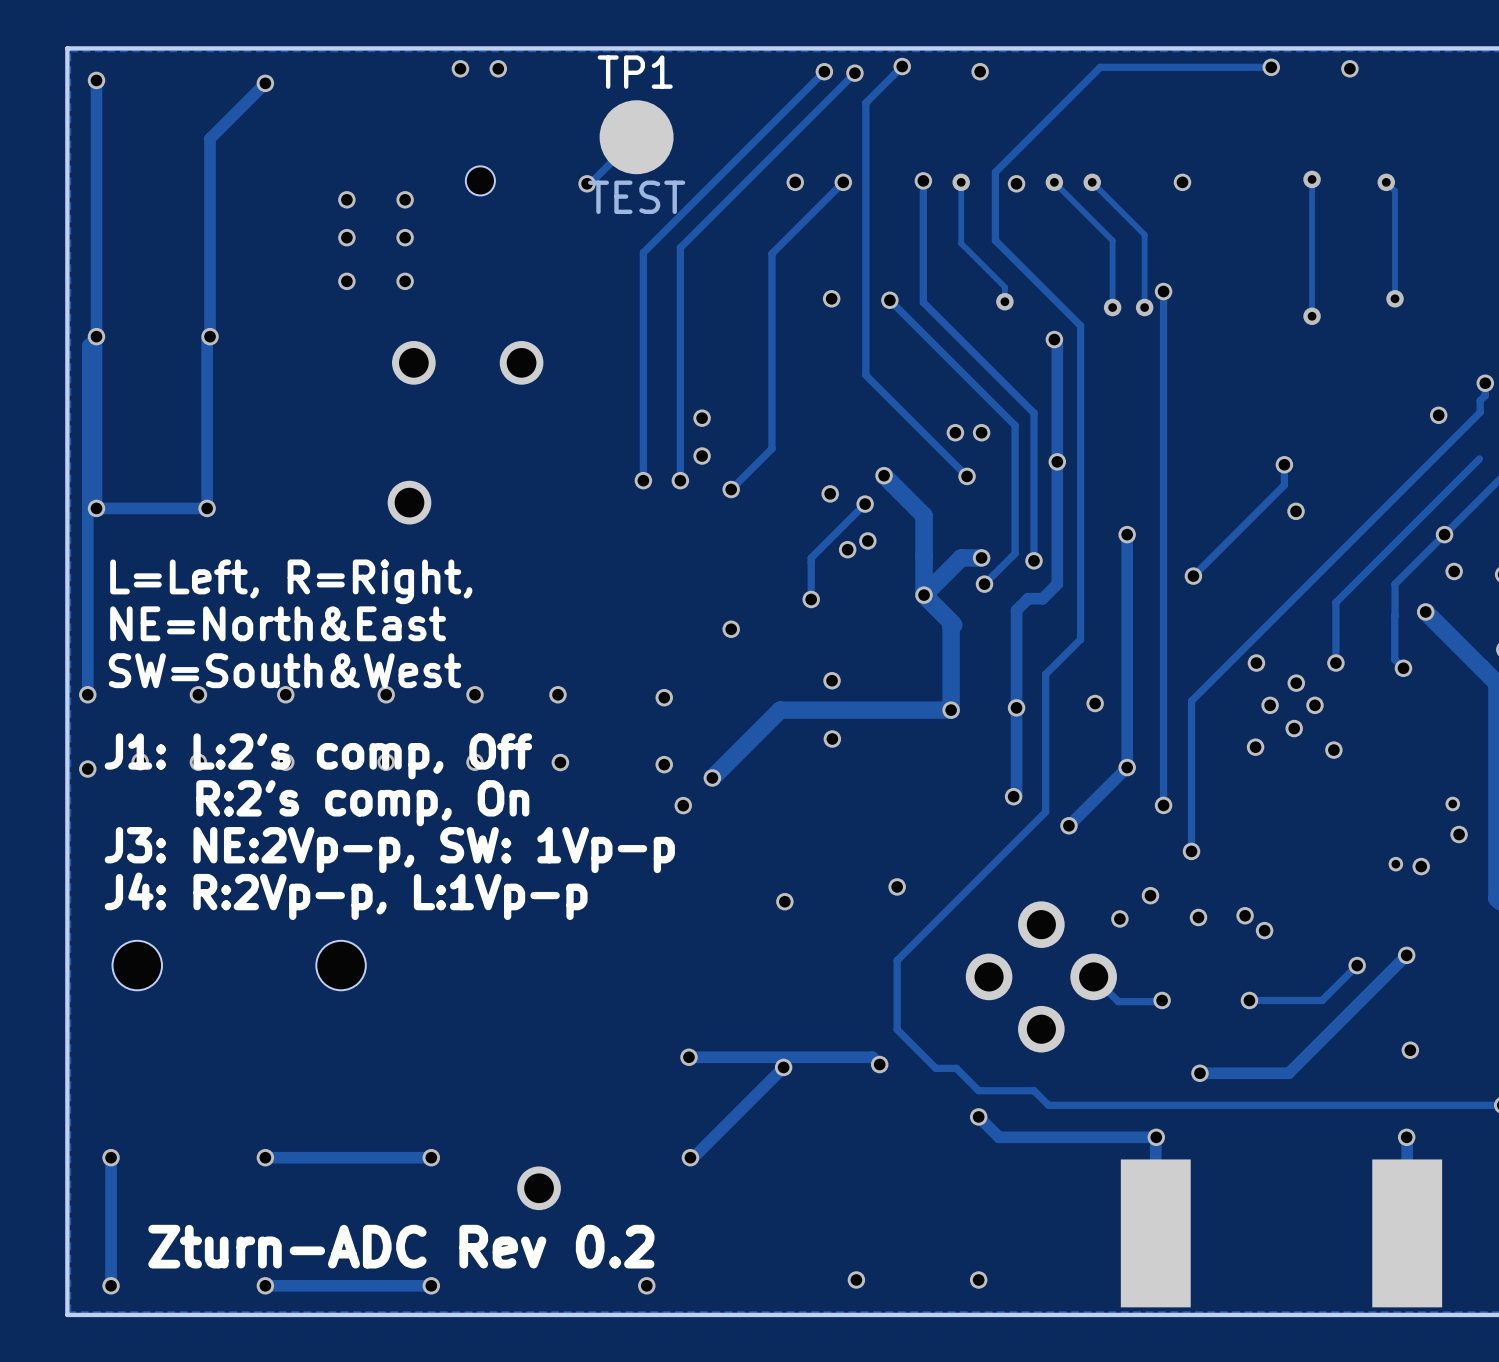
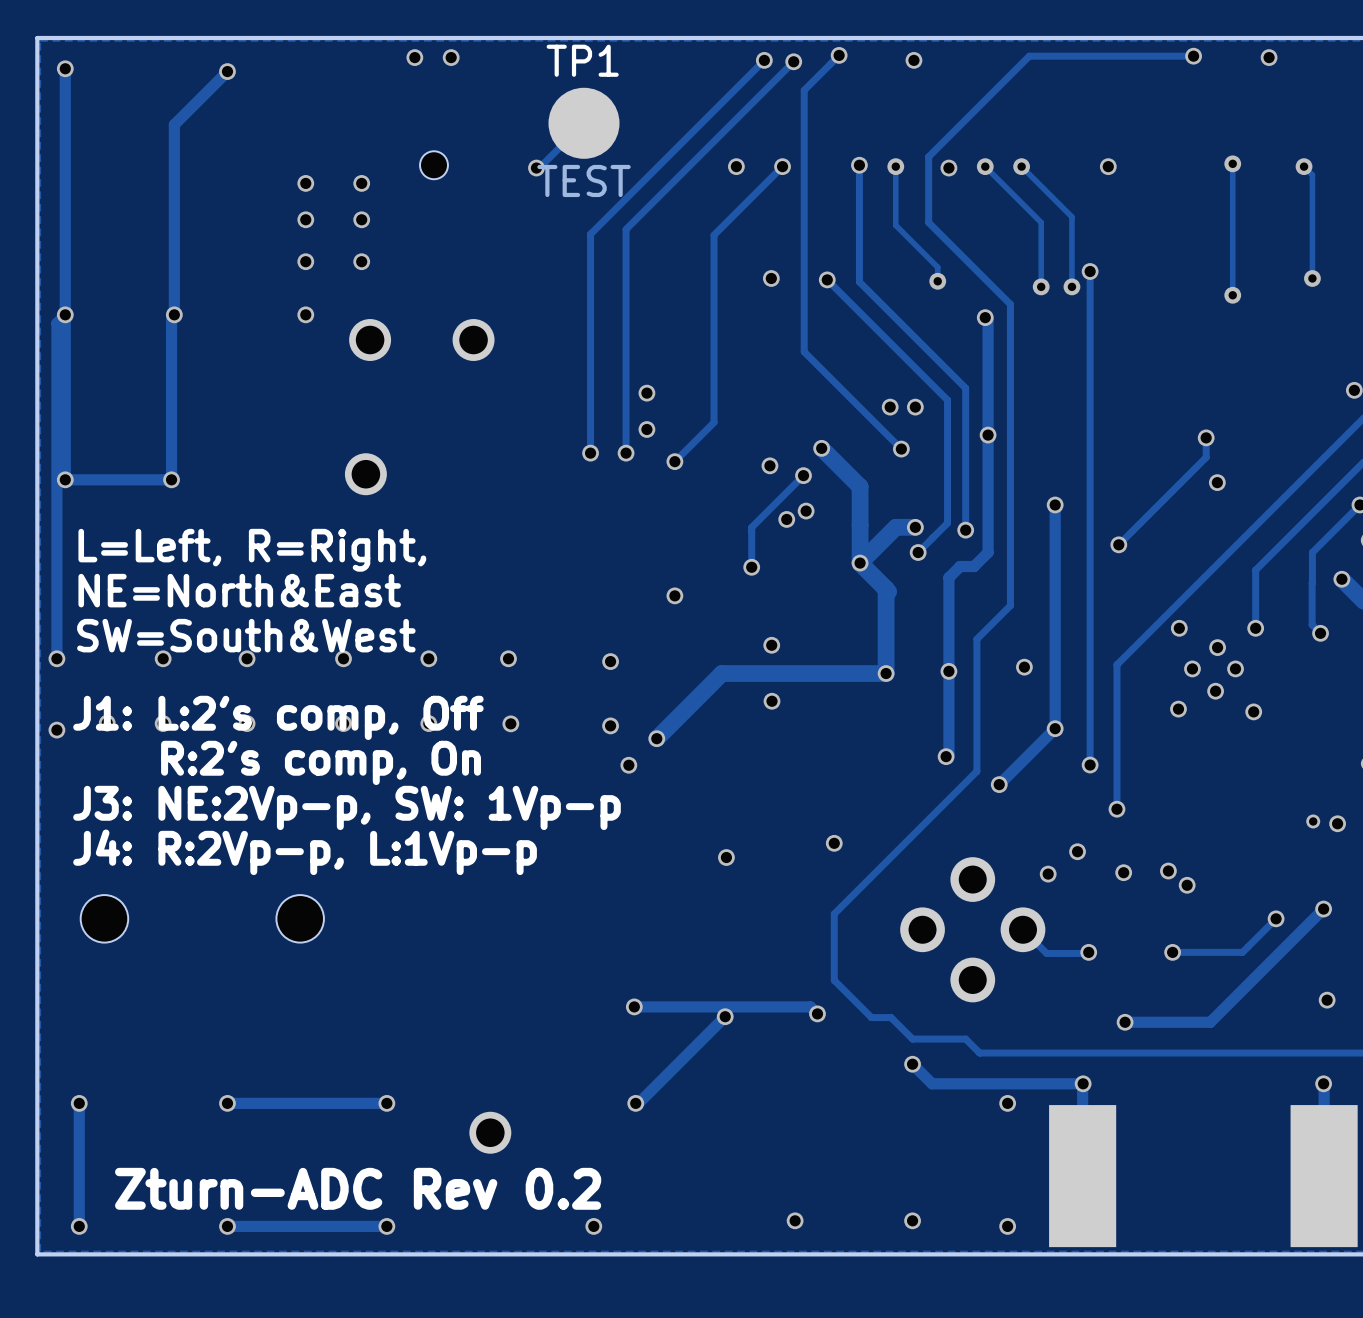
via: none -> (305, 314)
via: none -> (1007, 1103)
via: none -> (1007, 1226)

